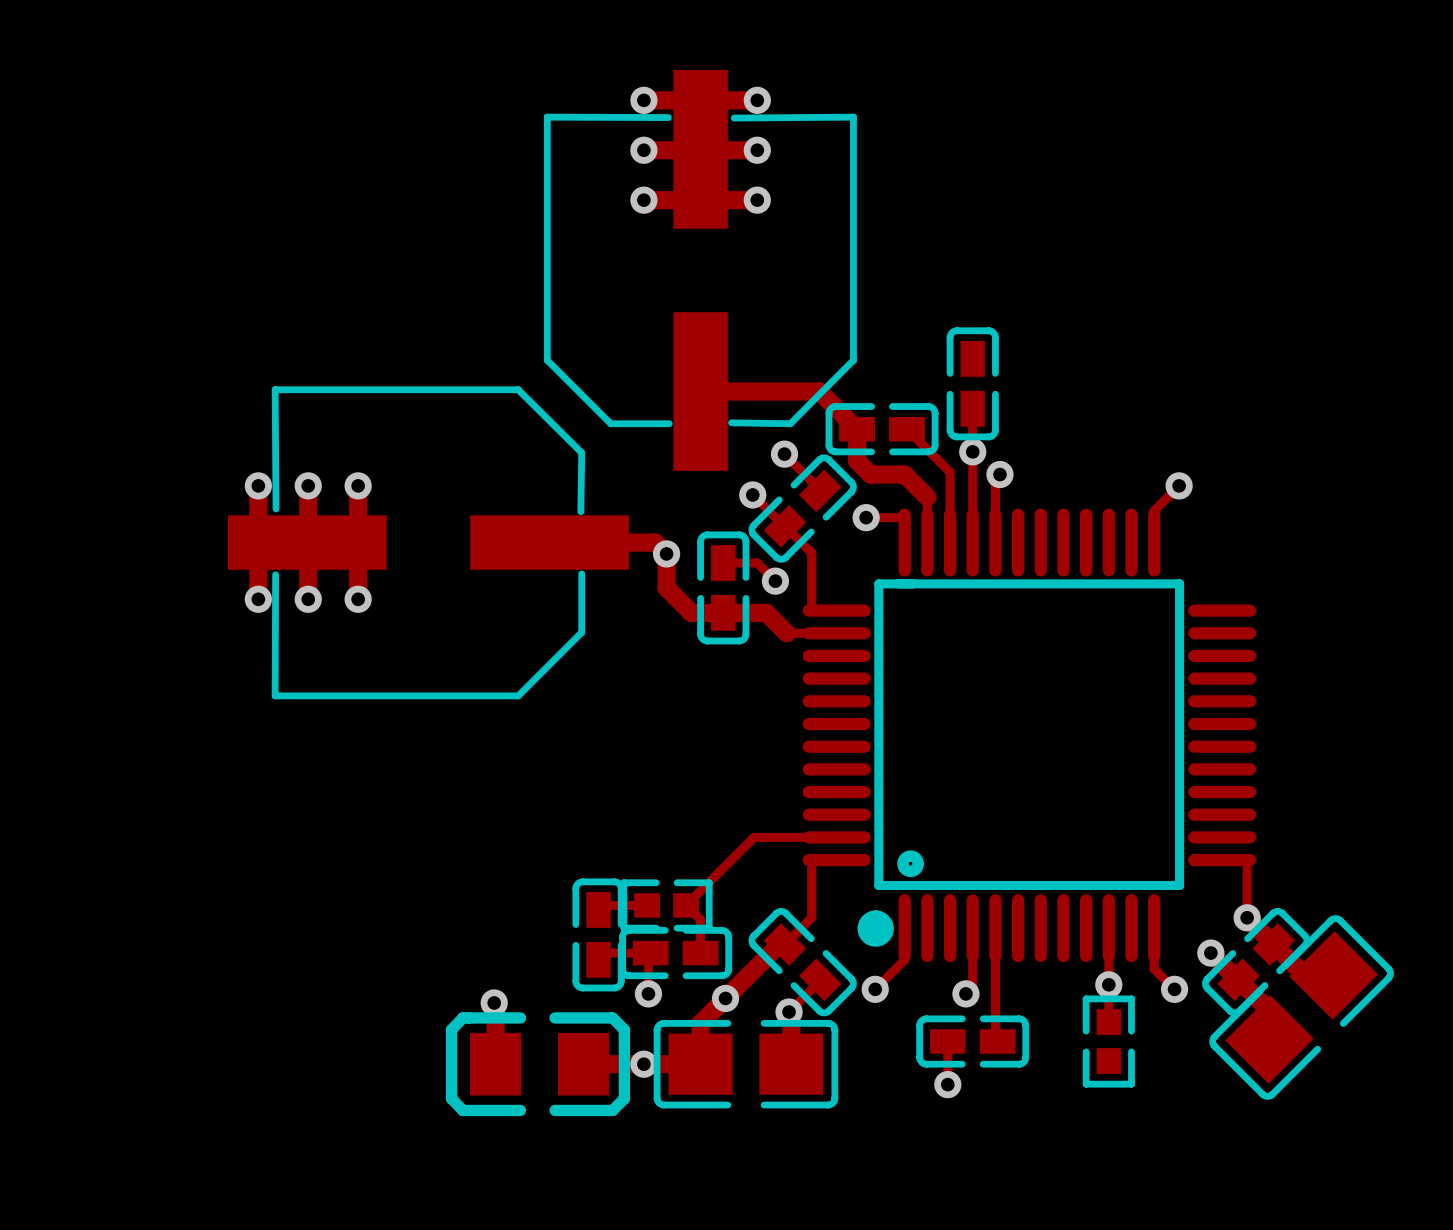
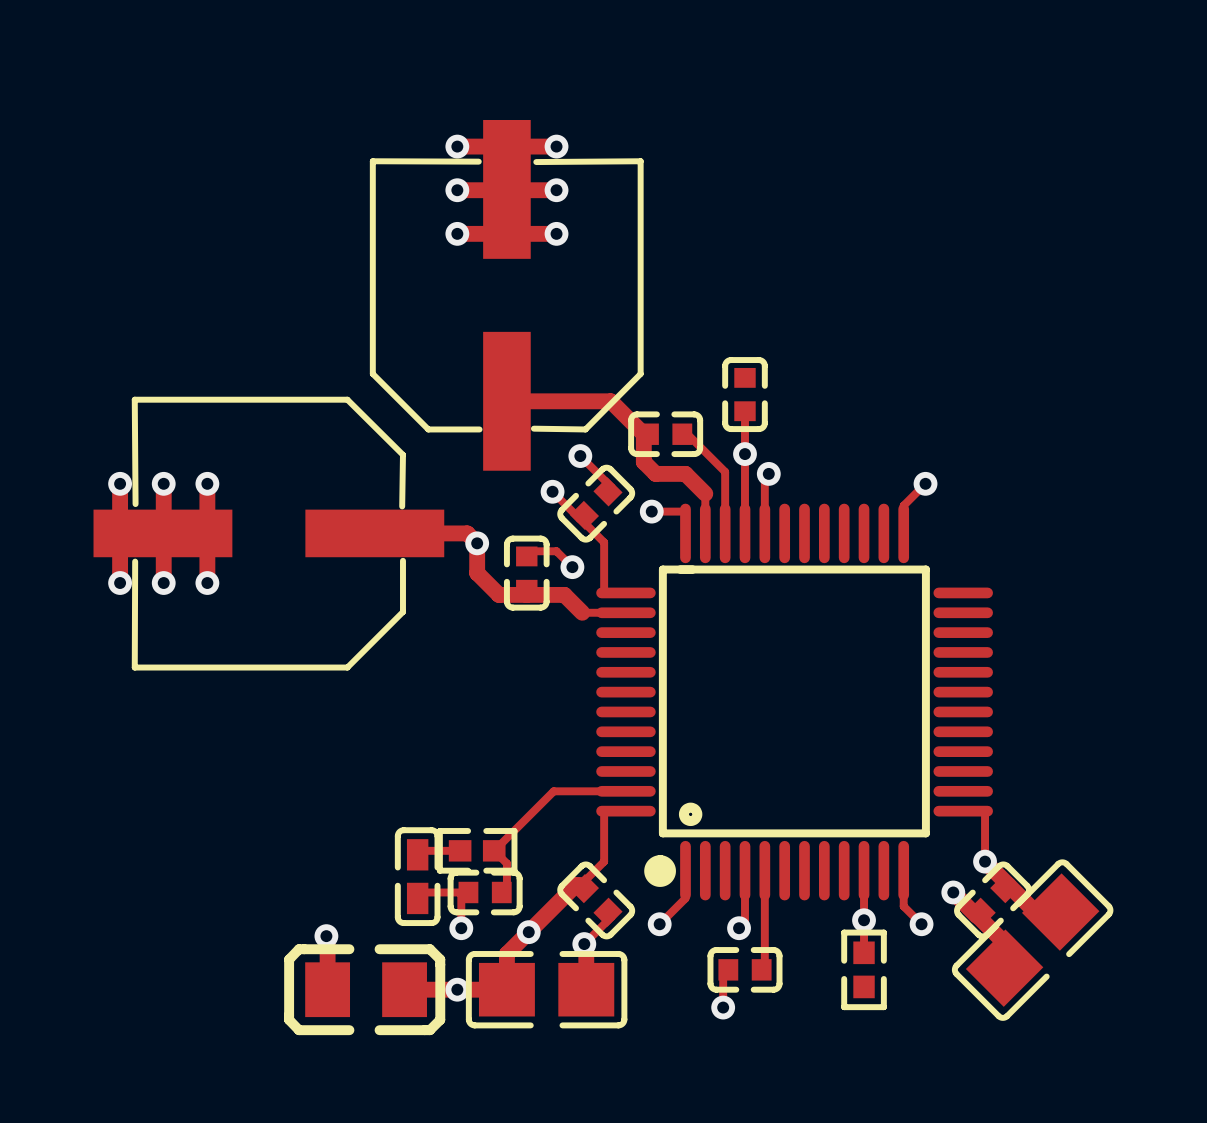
part footprint: [946, 327, 999, 441] -> [722, 357, 768, 433]
part footprint: [825, 403, 939, 456] -> [628, 411, 704, 458]
part footprint: [748, 454, 857, 563] -> [557, 464, 636, 543]
part footprint: [697, 531, 750, 645] -> [503, 535, 550, 611]
part footprint: [748, 908, 857, 1017] -> [557, 861, 636, 940]
part footprint: [1202, 908, 1311, 1017] -> [954, 861, 1032, 940]
part footprint: [619, 926, 733, 980] -> [447, 869, 523, 916]
part footprint: [916, 1015, 1030, 1068] -> [707, 947, 783, 993]

